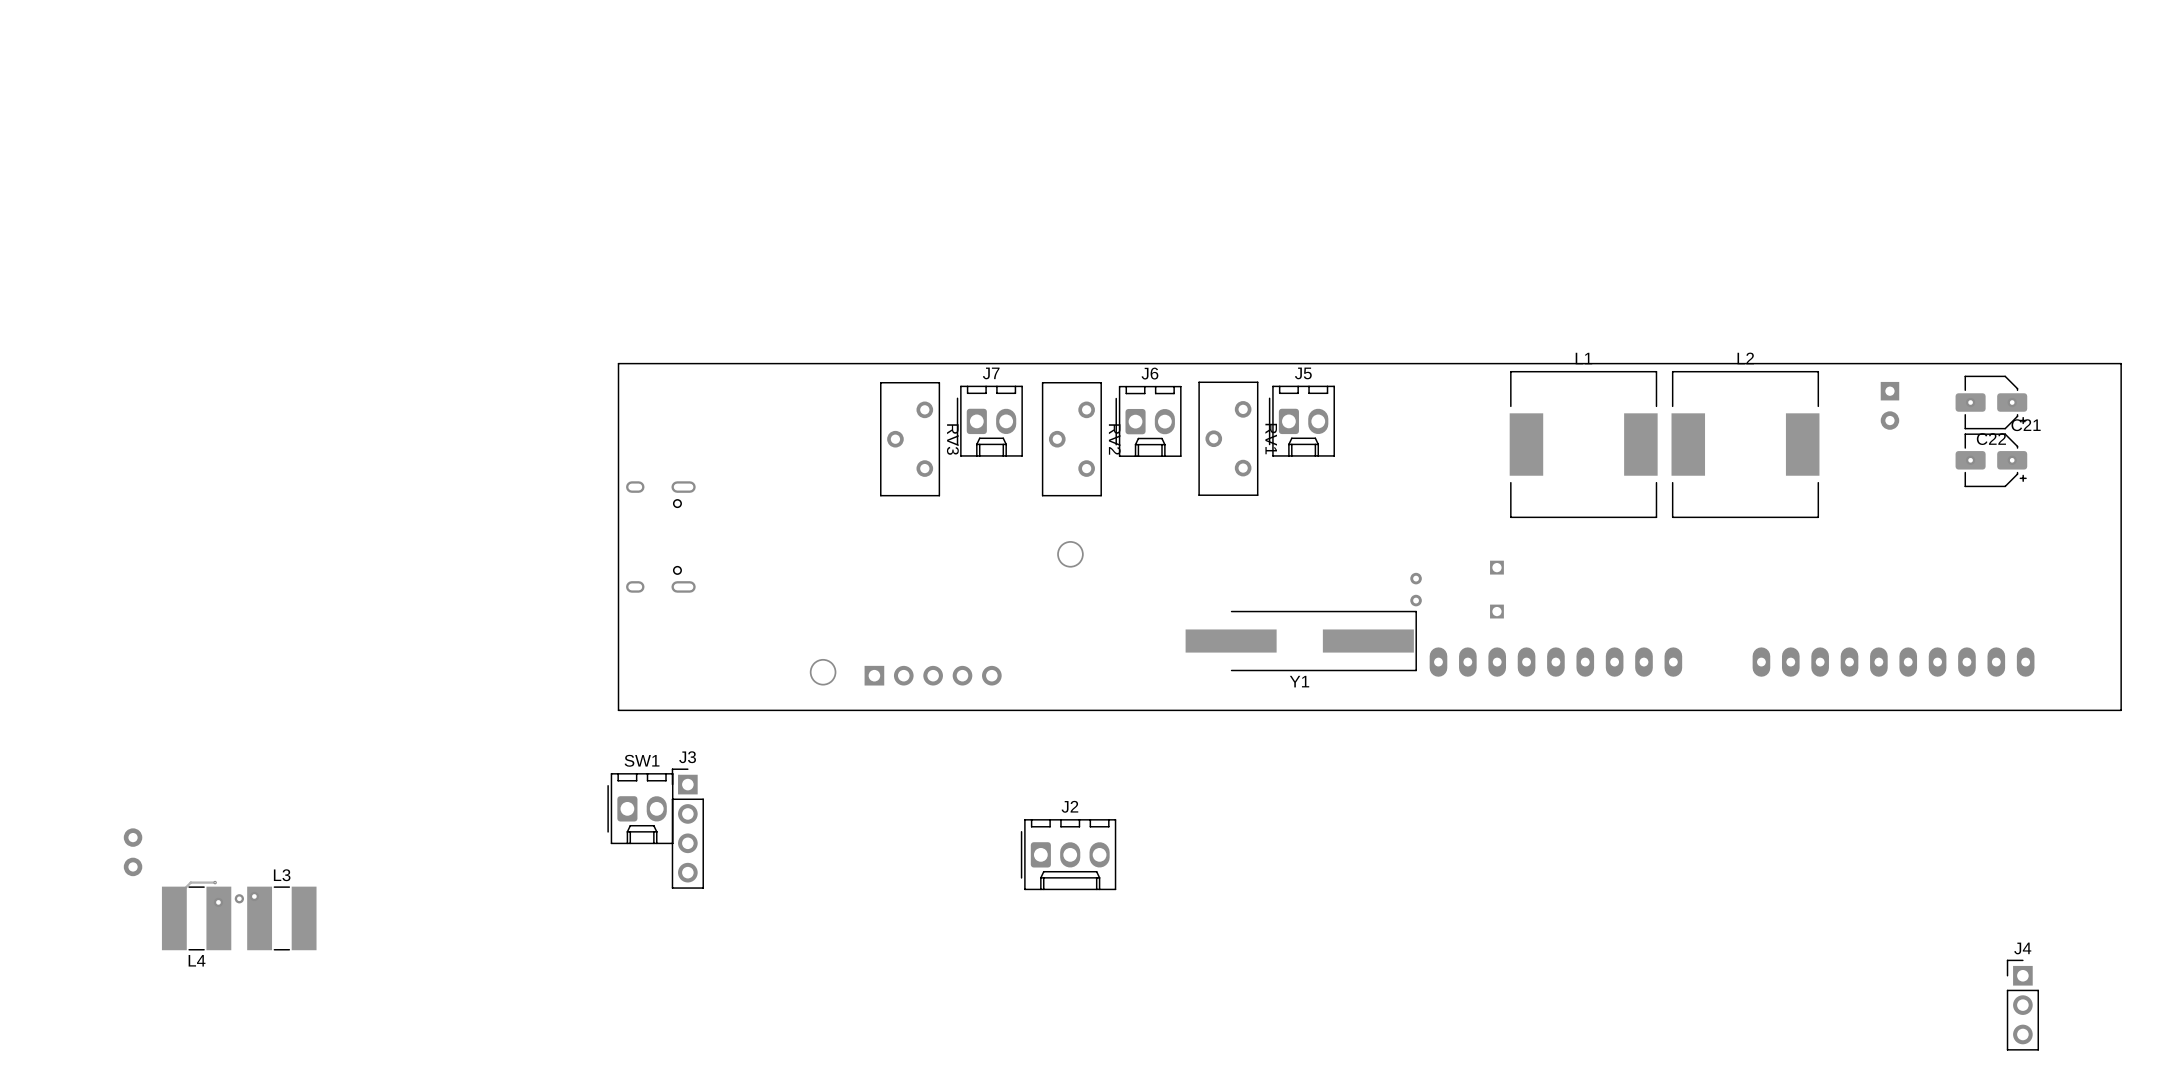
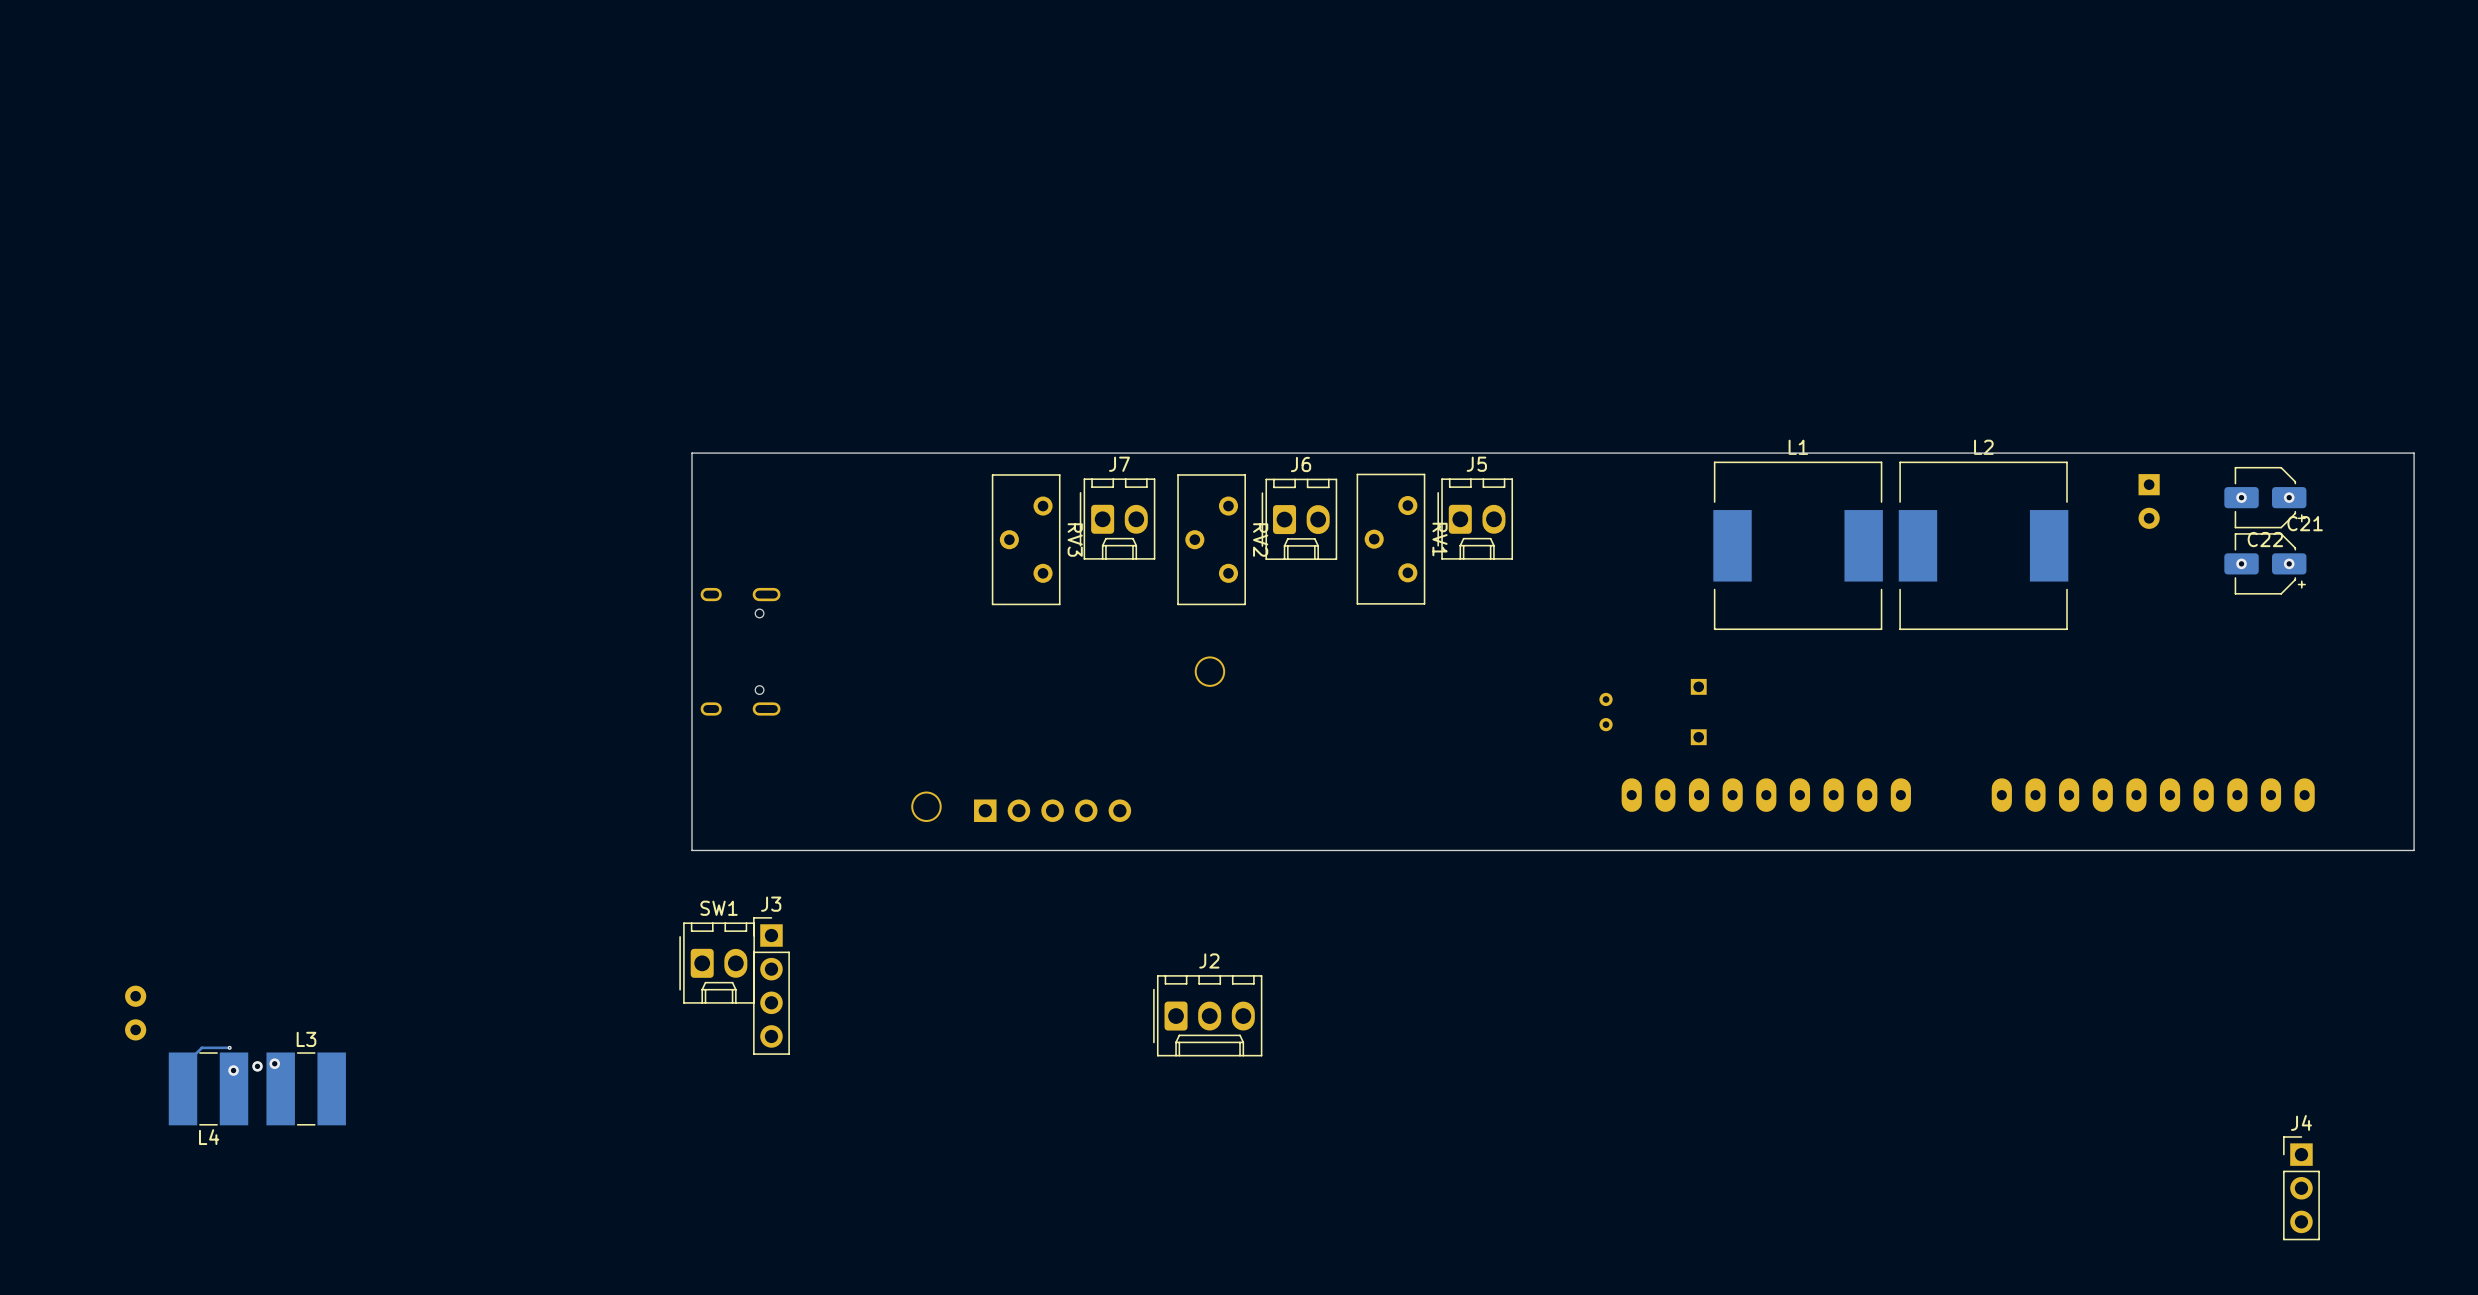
Y1: (1301, 641) -> none

